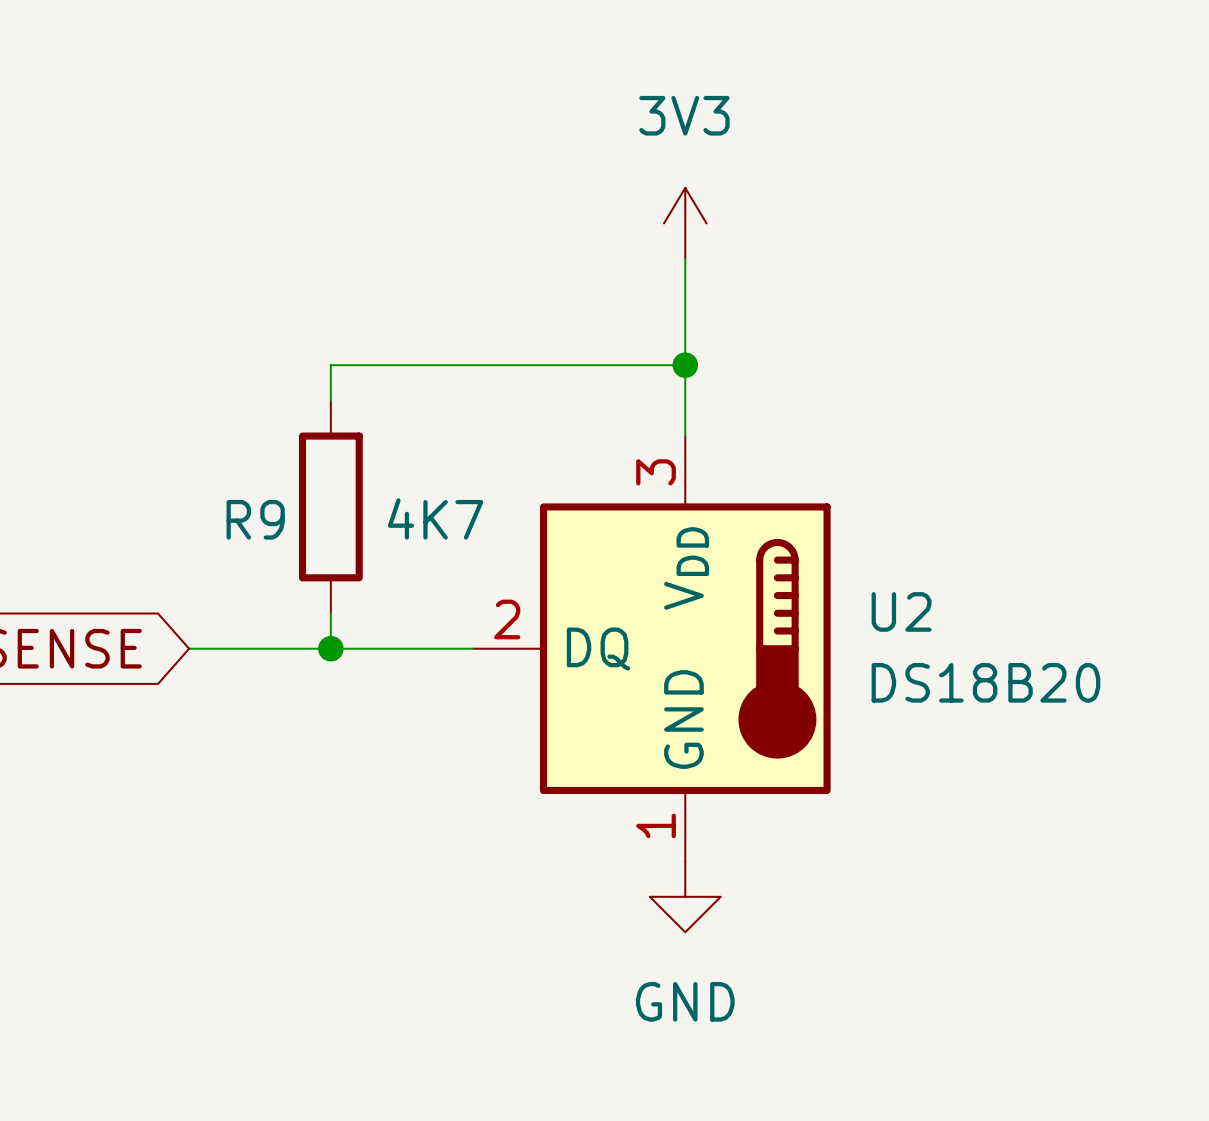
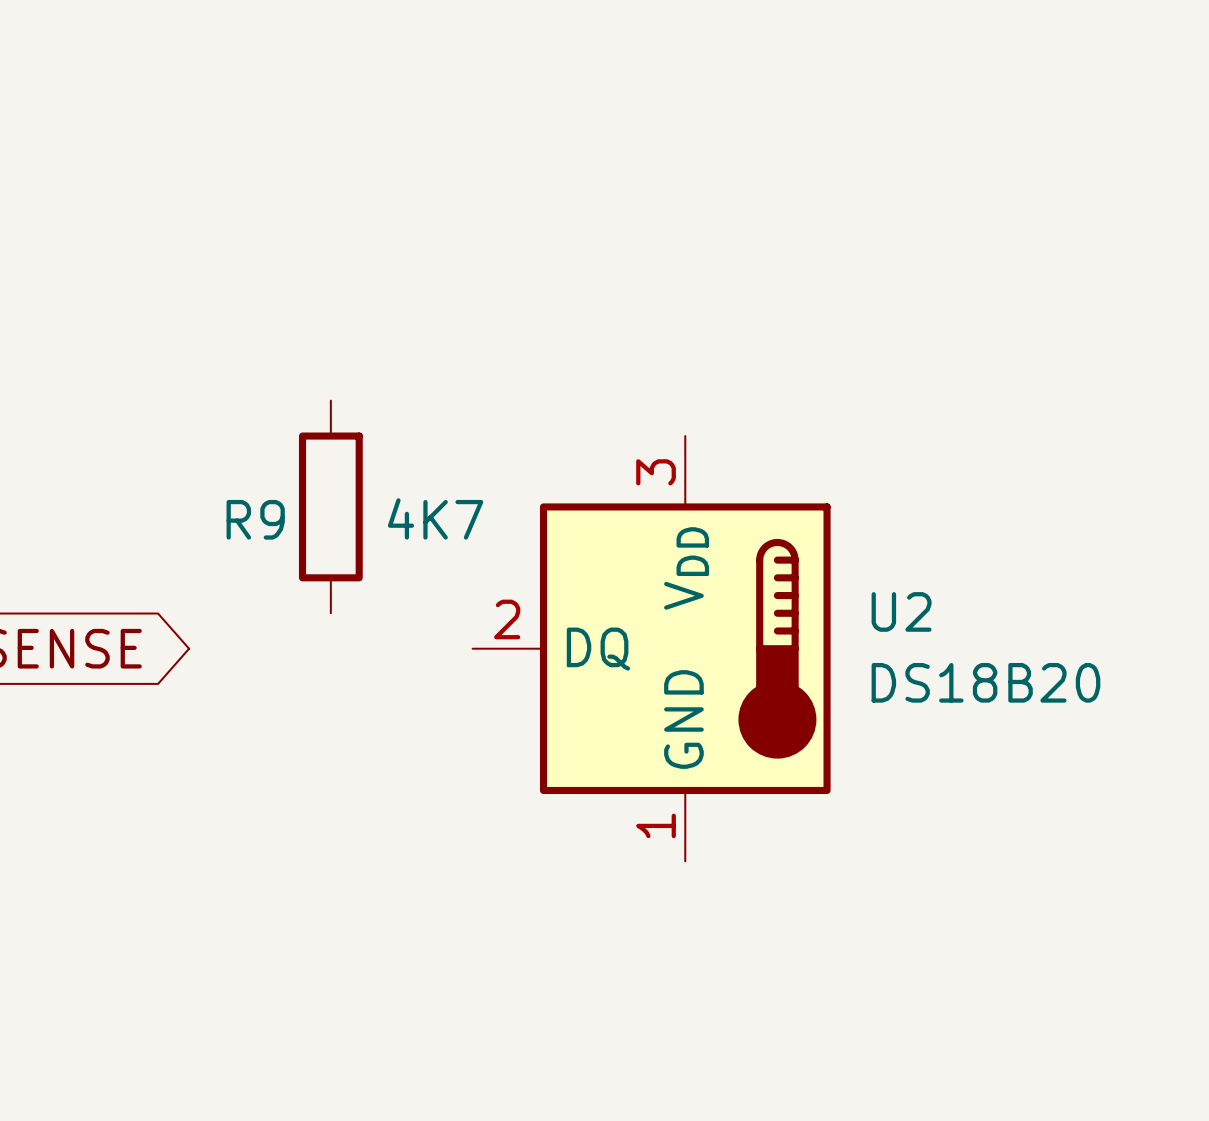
power symbol: 3V3 (685, 223) -> none
wire: (685, 258) (685, 436) -> none
wire: (685, 365) (330, 365) (330, 400) -> none
junction: (685, 365) -> none
wire: (330, 613) (330, 648) -> none
wire: (189, 648) (472, 648) -> none
junction: (330, 648) -> none
power symbol: GND (685, 896) -> none

